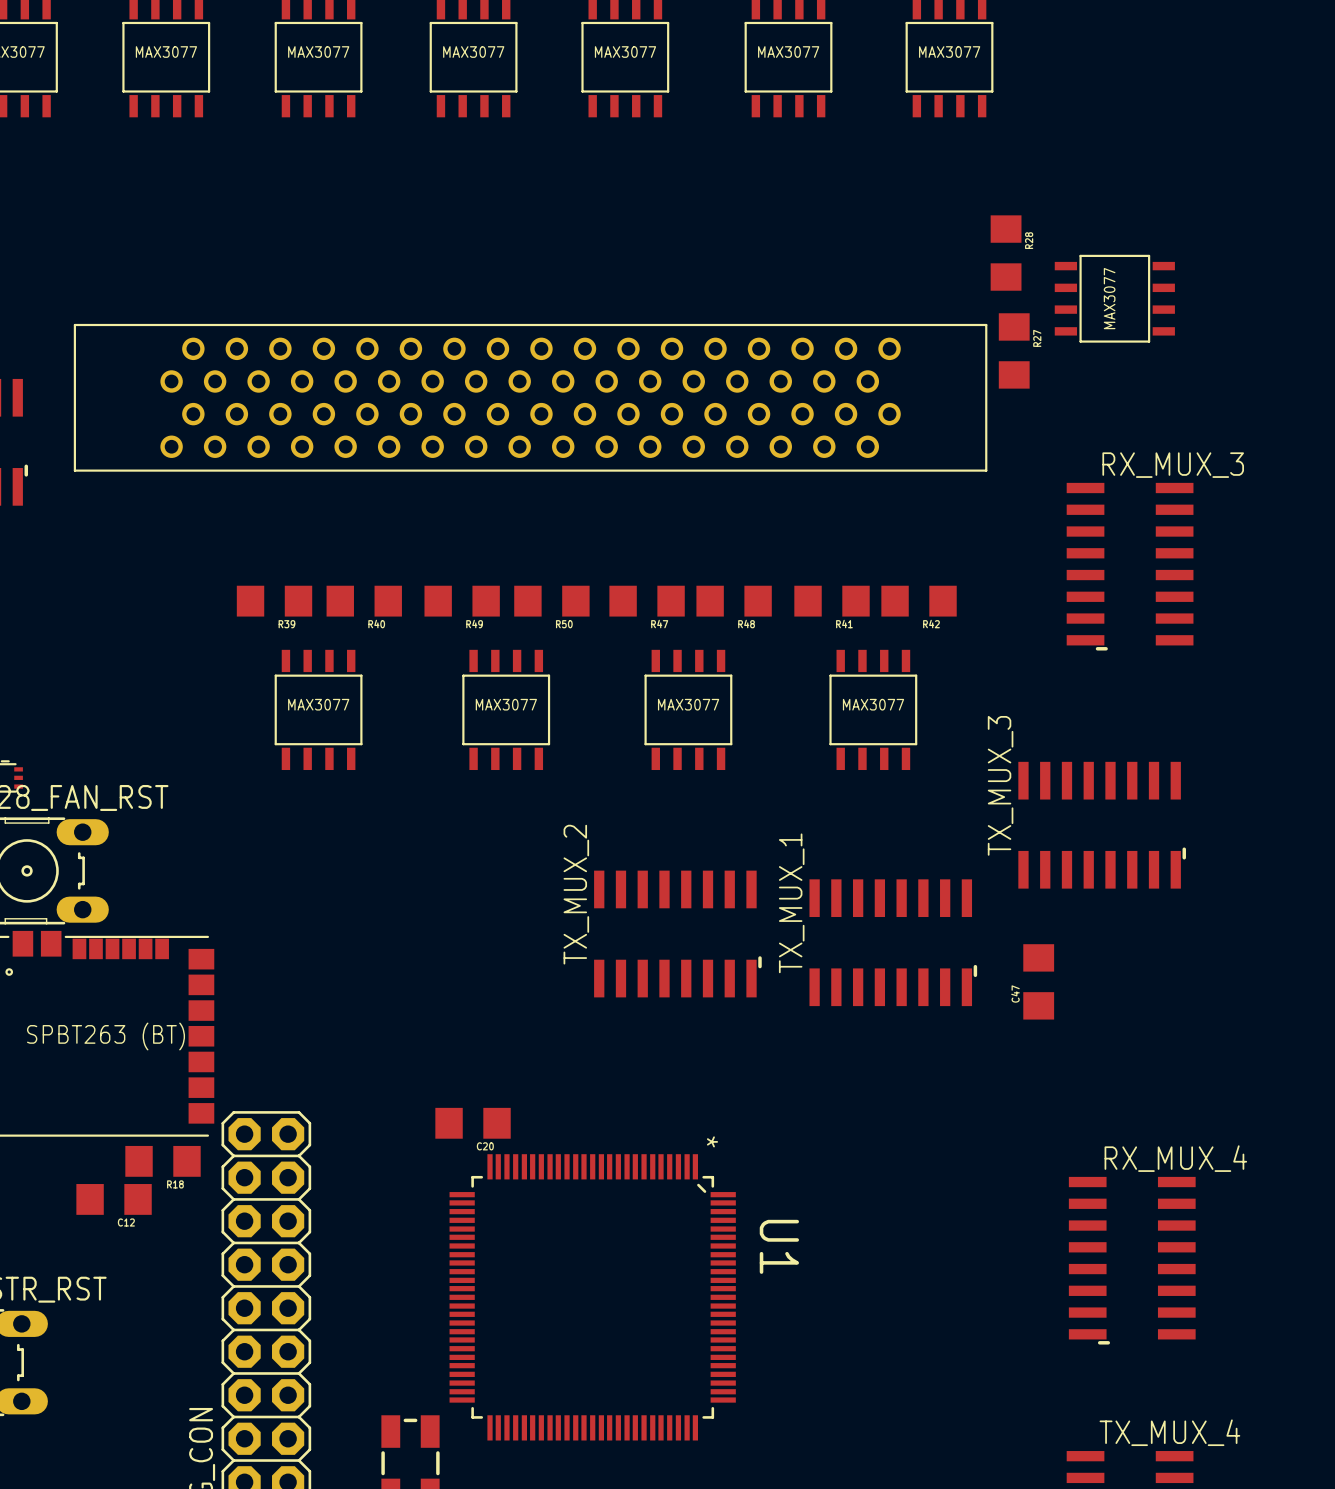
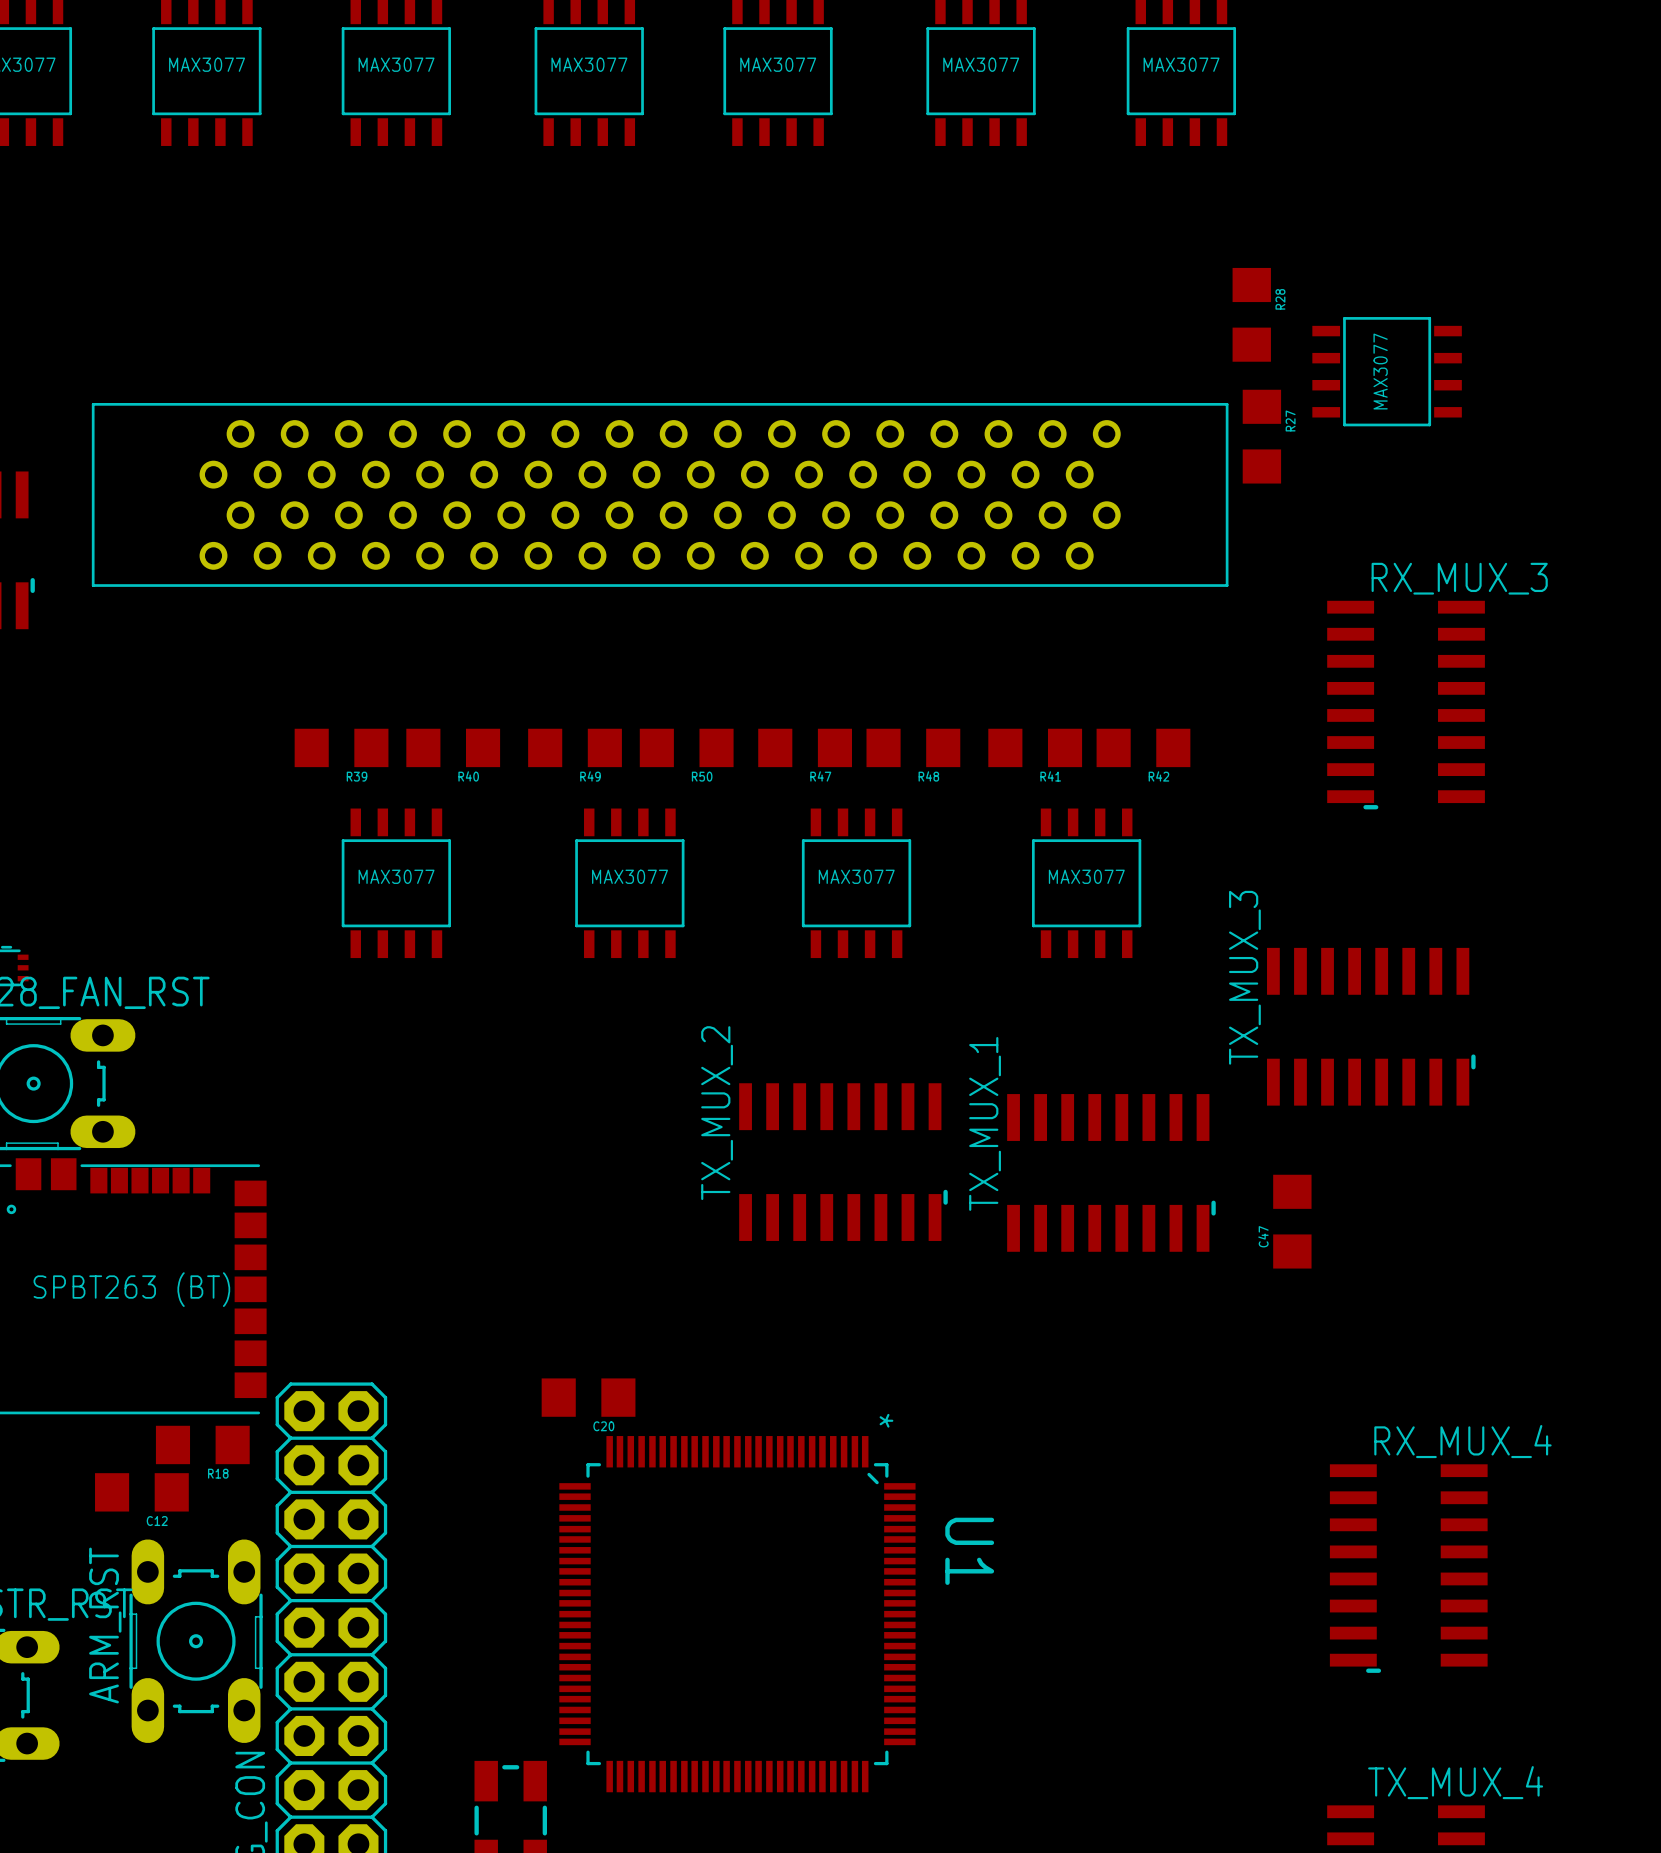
ARM_RST: none -> (196, 1641)

